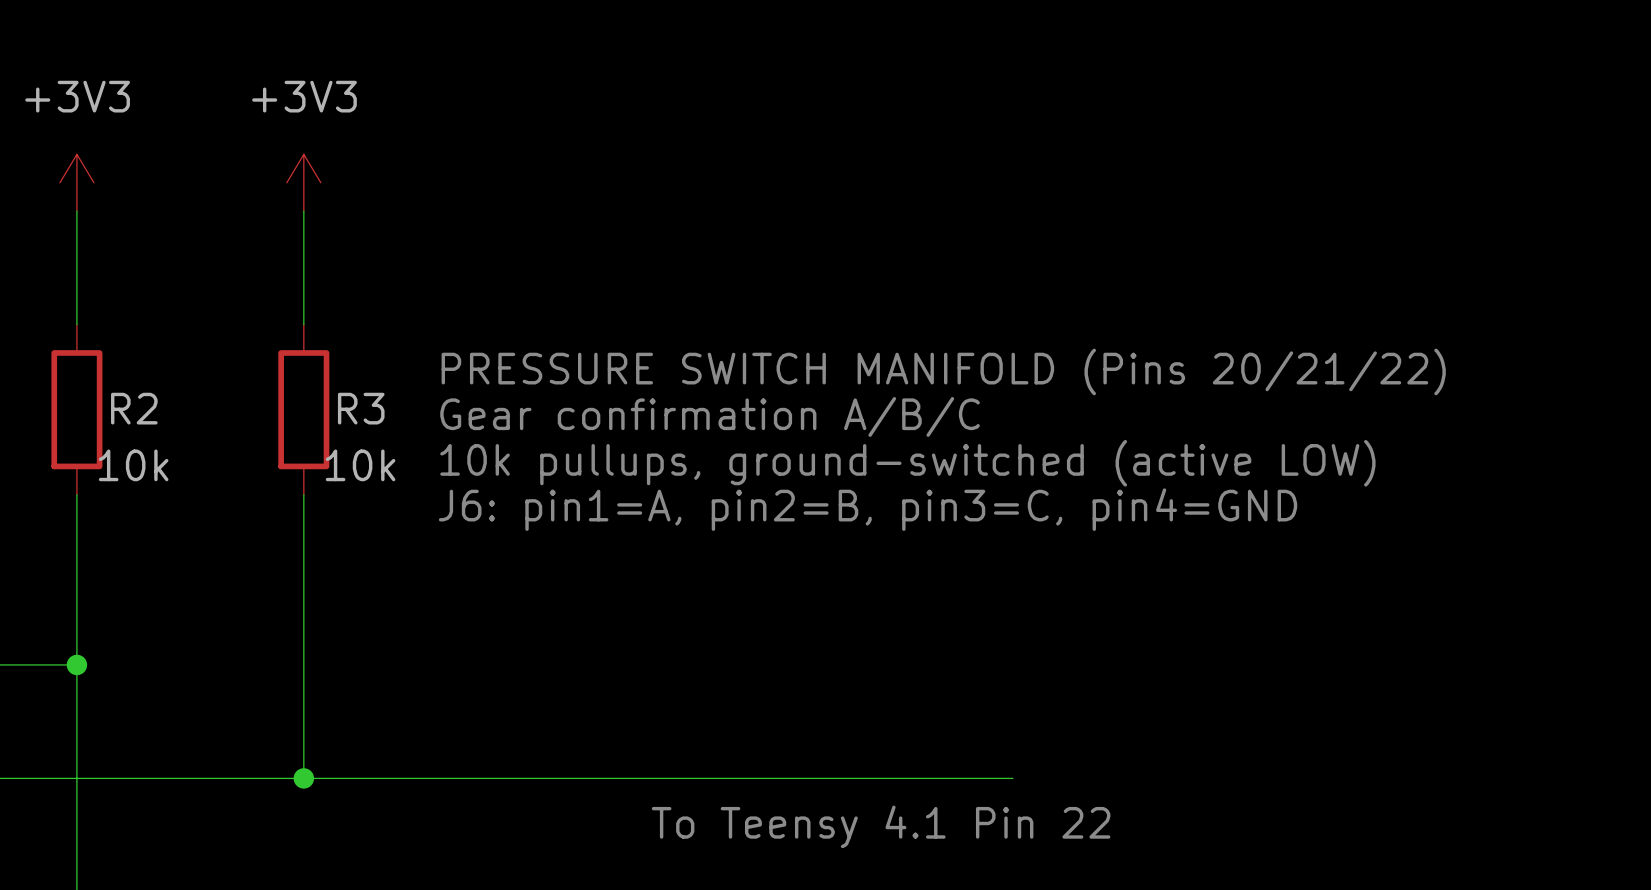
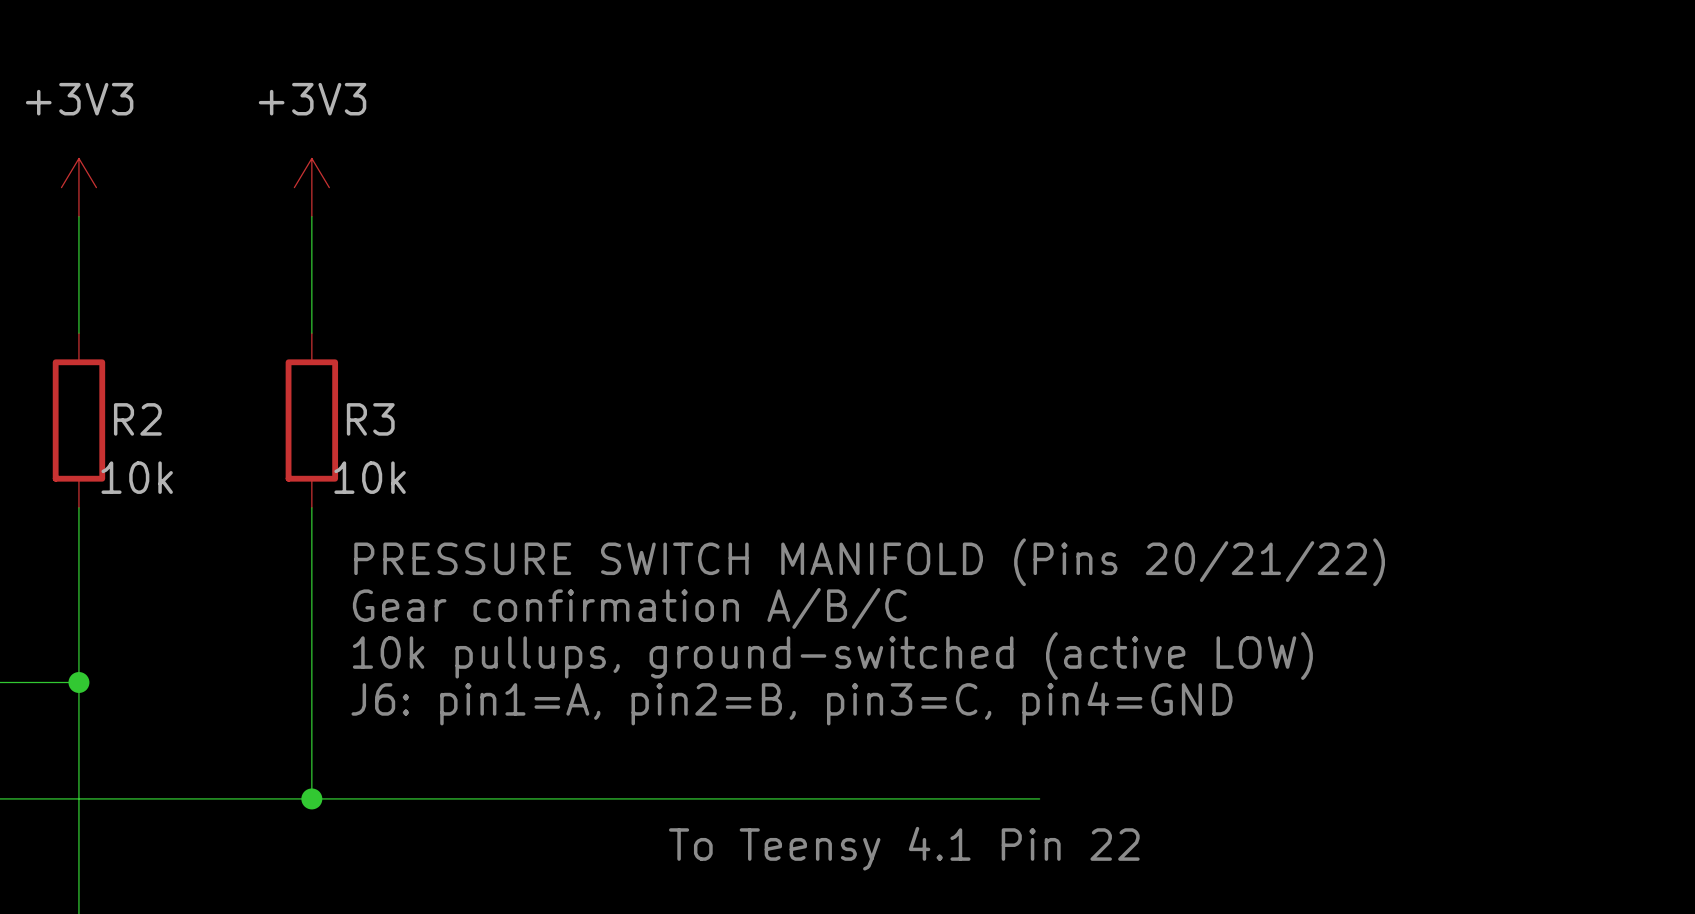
text position: PRESSURE SWITCH MANIFOLD (Pins 20/21/22) (943, 371) -> PRESSURE SWITCH MANIFOLD (Pins 20/21/22) (869, 562)
text position: Gear confirmation A/B/C (710, 416) -> Gear confirmation A/B/C (629, 608)
text position: 10k pullups, ground-switched (active LOW) (907, 463) -> 10k pullups, ground-switched (active LOW) (832, 656)
text position: J6: pin1=A, pin2=B, pin3=C, pin4=GND (868, 509) -> J6: pin1=A, pin2=B, pin3=C, pin4=GND (791, 703)

